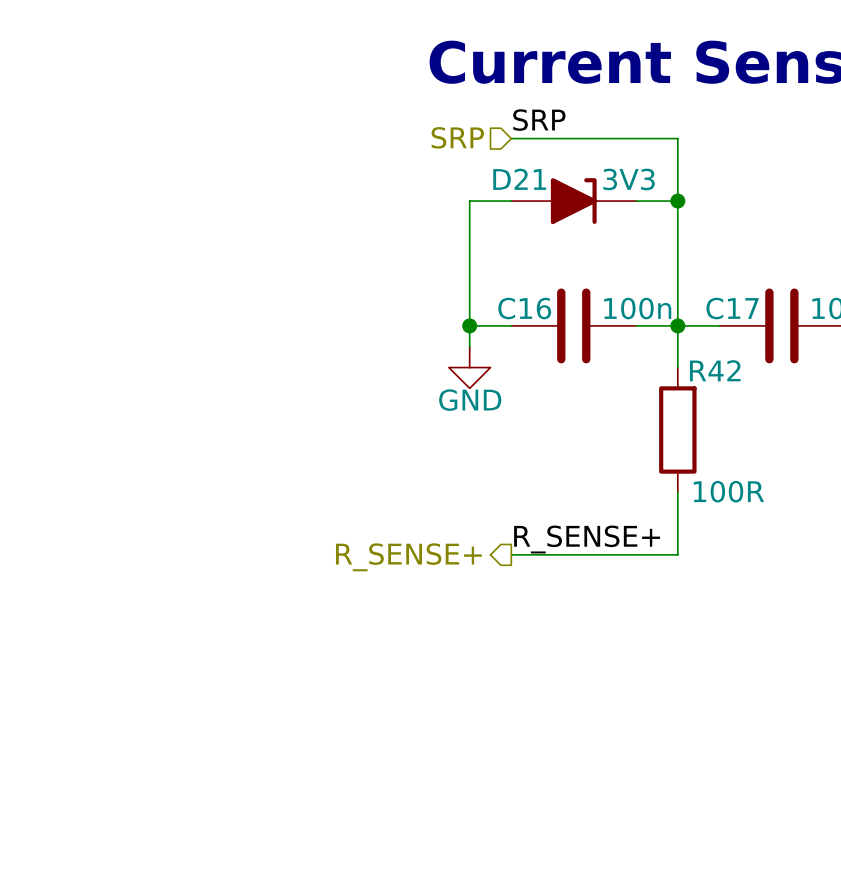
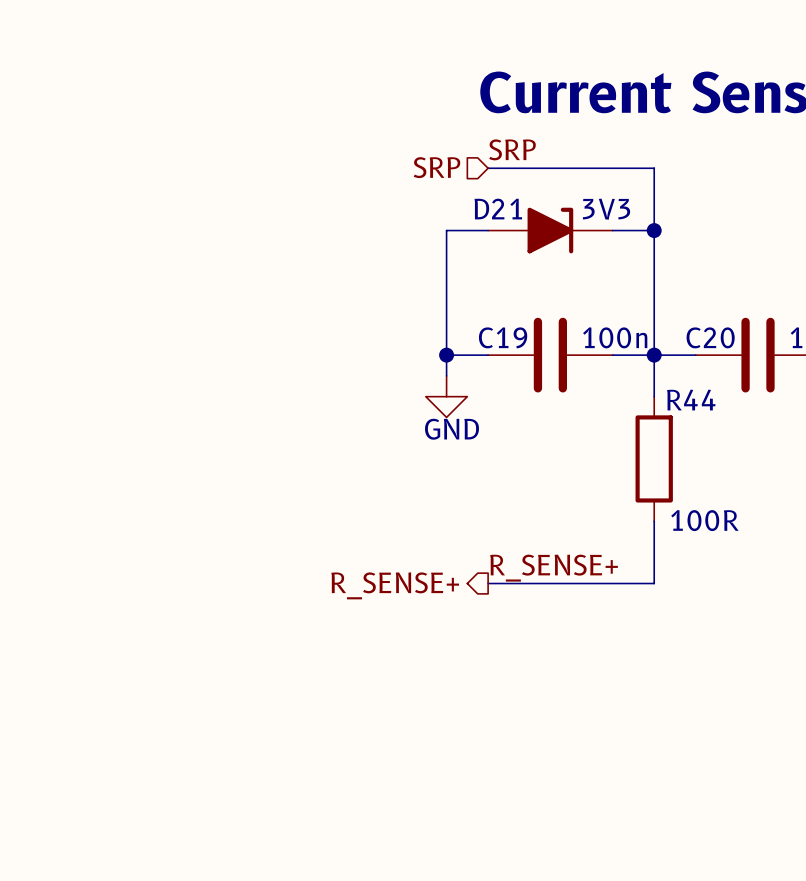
C16 name: C16 (524, 308) -> C19 (503, 337)
C17 name: C17 (732, 308) -> C20 (710, 337)
R42 name: R42 (715, 370) -> R44 (691, 400)

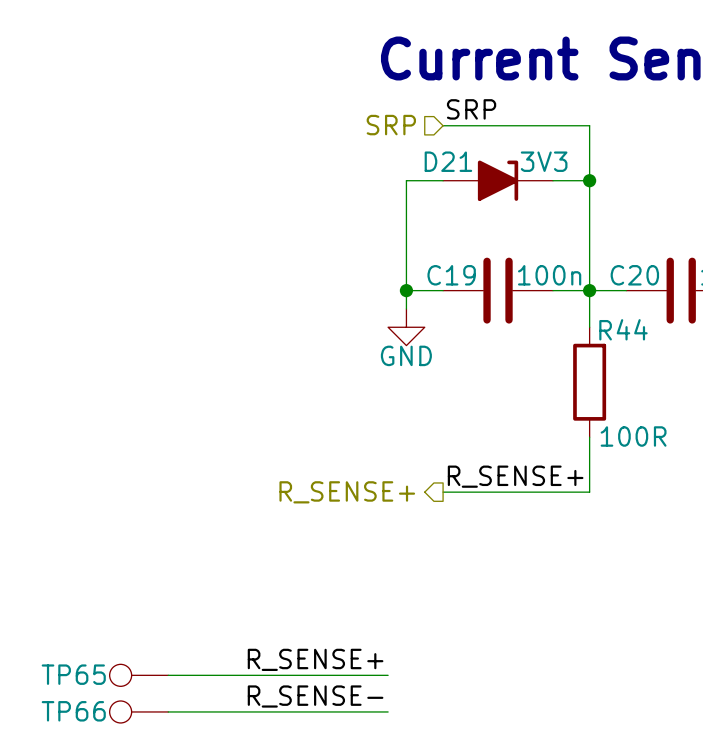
label: none -> R_SENSE+ (315, 659)
TP65: none -> (138, 675)
wire: none -> (168, 675) (388, 675)
label: none -> R_SENSE- (315, 696)
TP66: none -> (138, 711)
wire: none -> (168, 711) (388, 711)

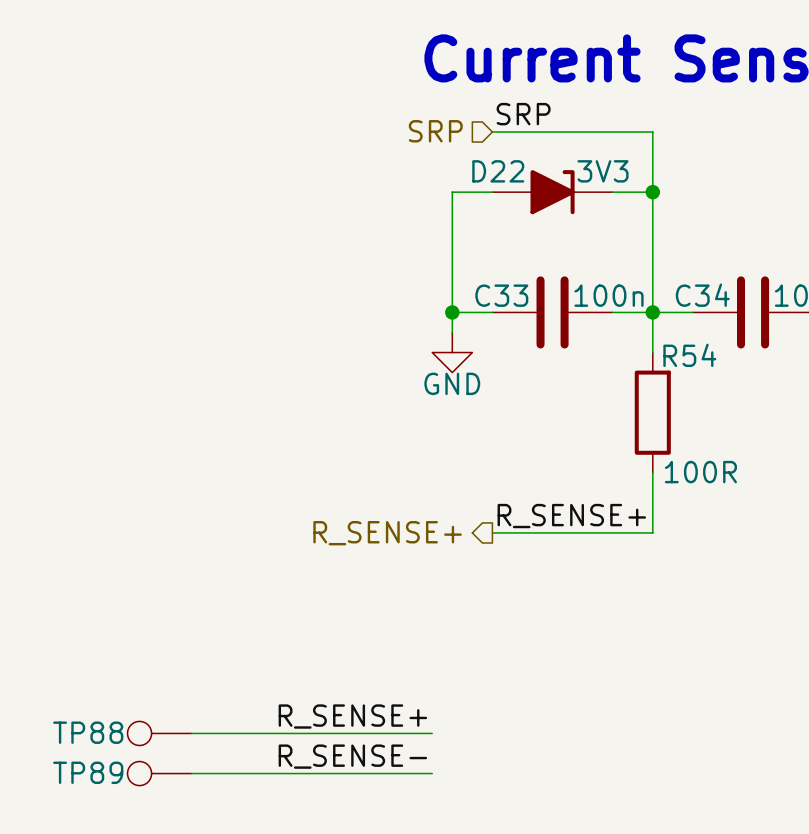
D21 name: D21 (448, 161) -> D22 (498, 171)
C19 name: C19 (451, 275) -> C33 (501, 295)
C20 name: C20 (634, 275) -> C34 (702, 295)
R44 name: R44 (623, 329) -> R54 (689, 355)
TP65 name: TP65 (73, 674) -> TP88 (88, 732)
TP66 name: TP66 (73, 711) -> TP89 (88, 772)

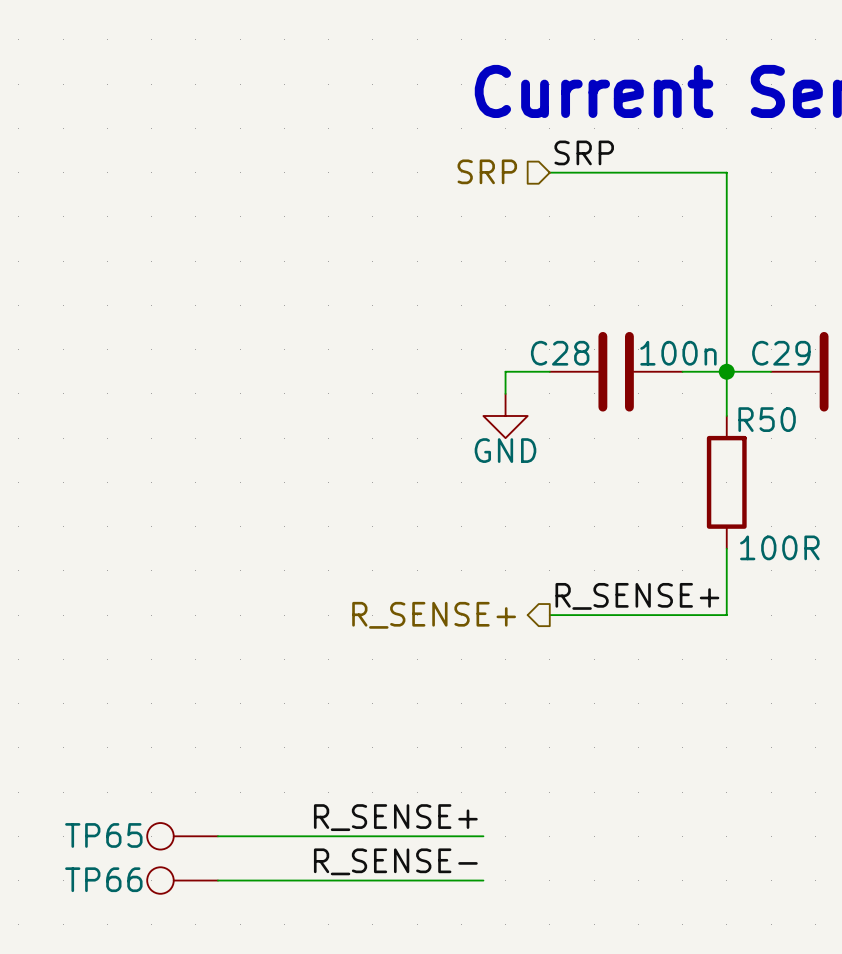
wire: (492, 192) (452, 192) (452, 312) -> none
D22: 3V3 (552, 192) -> none
wire: (612, 192) (652, 192) -> none
junction: (652, 192) -> none
C33 name: C33 (501, 295) -> C28 (560, 353)
C34 name: C34 (702, 295) -> C29 (781, 353)
junction: (452, 312) -> none
R54 name: R54 (689, 355) -> R50 (767, 419)
TP88 name: TP88 (88, 732) -> TP65 (103, 835)
TP89 name: TP89 (88, 772) -> TP66 (103, 879)

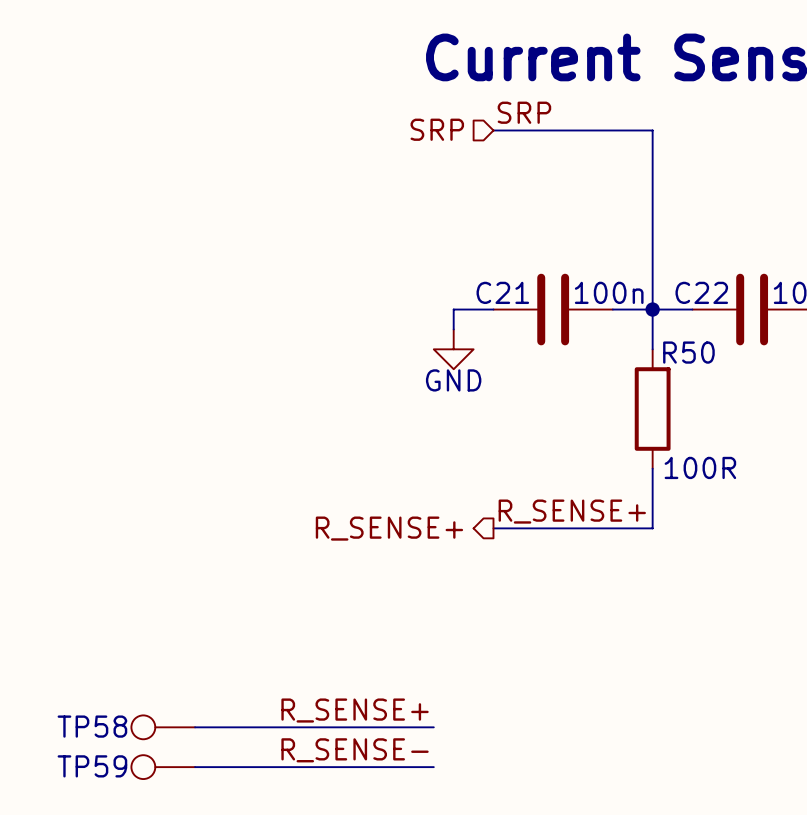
C28 name: C28 (560, 353) -> C21 (502, 292)
C29 name: C29 (781, 353) -> C22 (701, 292)
TP65 name: TP65 (103, 835) -> TP58 (92, 726)
TP66 name: TP66 (103, 879) -> TP59 (92, 766)

